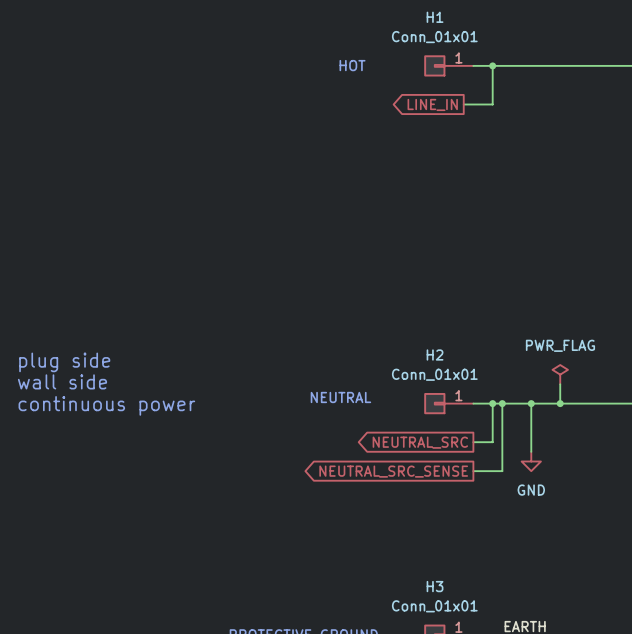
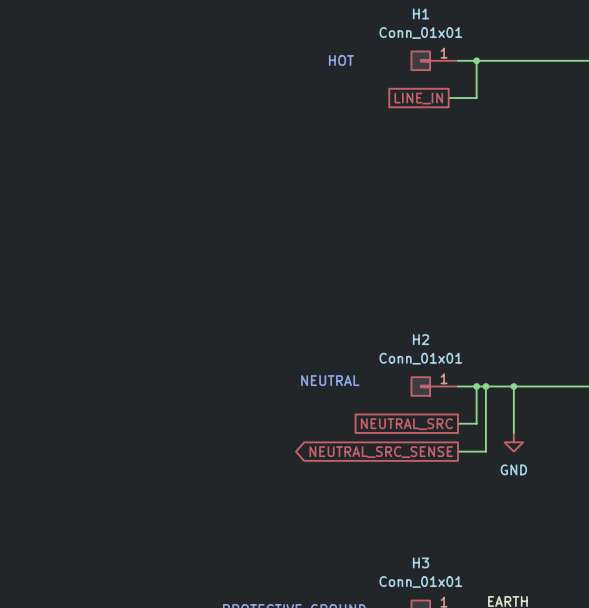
global label shape: output (432, 104) -> passive (418, 98)
text: plug side (64, 362) -> none
power symbol: PWR_FLAG (560, 374) -> none
text: wall side (62, 381) -> none
wire: (560, 384) (560, 403) -> none
junction: (560, 403) -> none
text: continuous power (106, 405) -> none
global label shape: output (420, 442) -> passive (406, 424)

